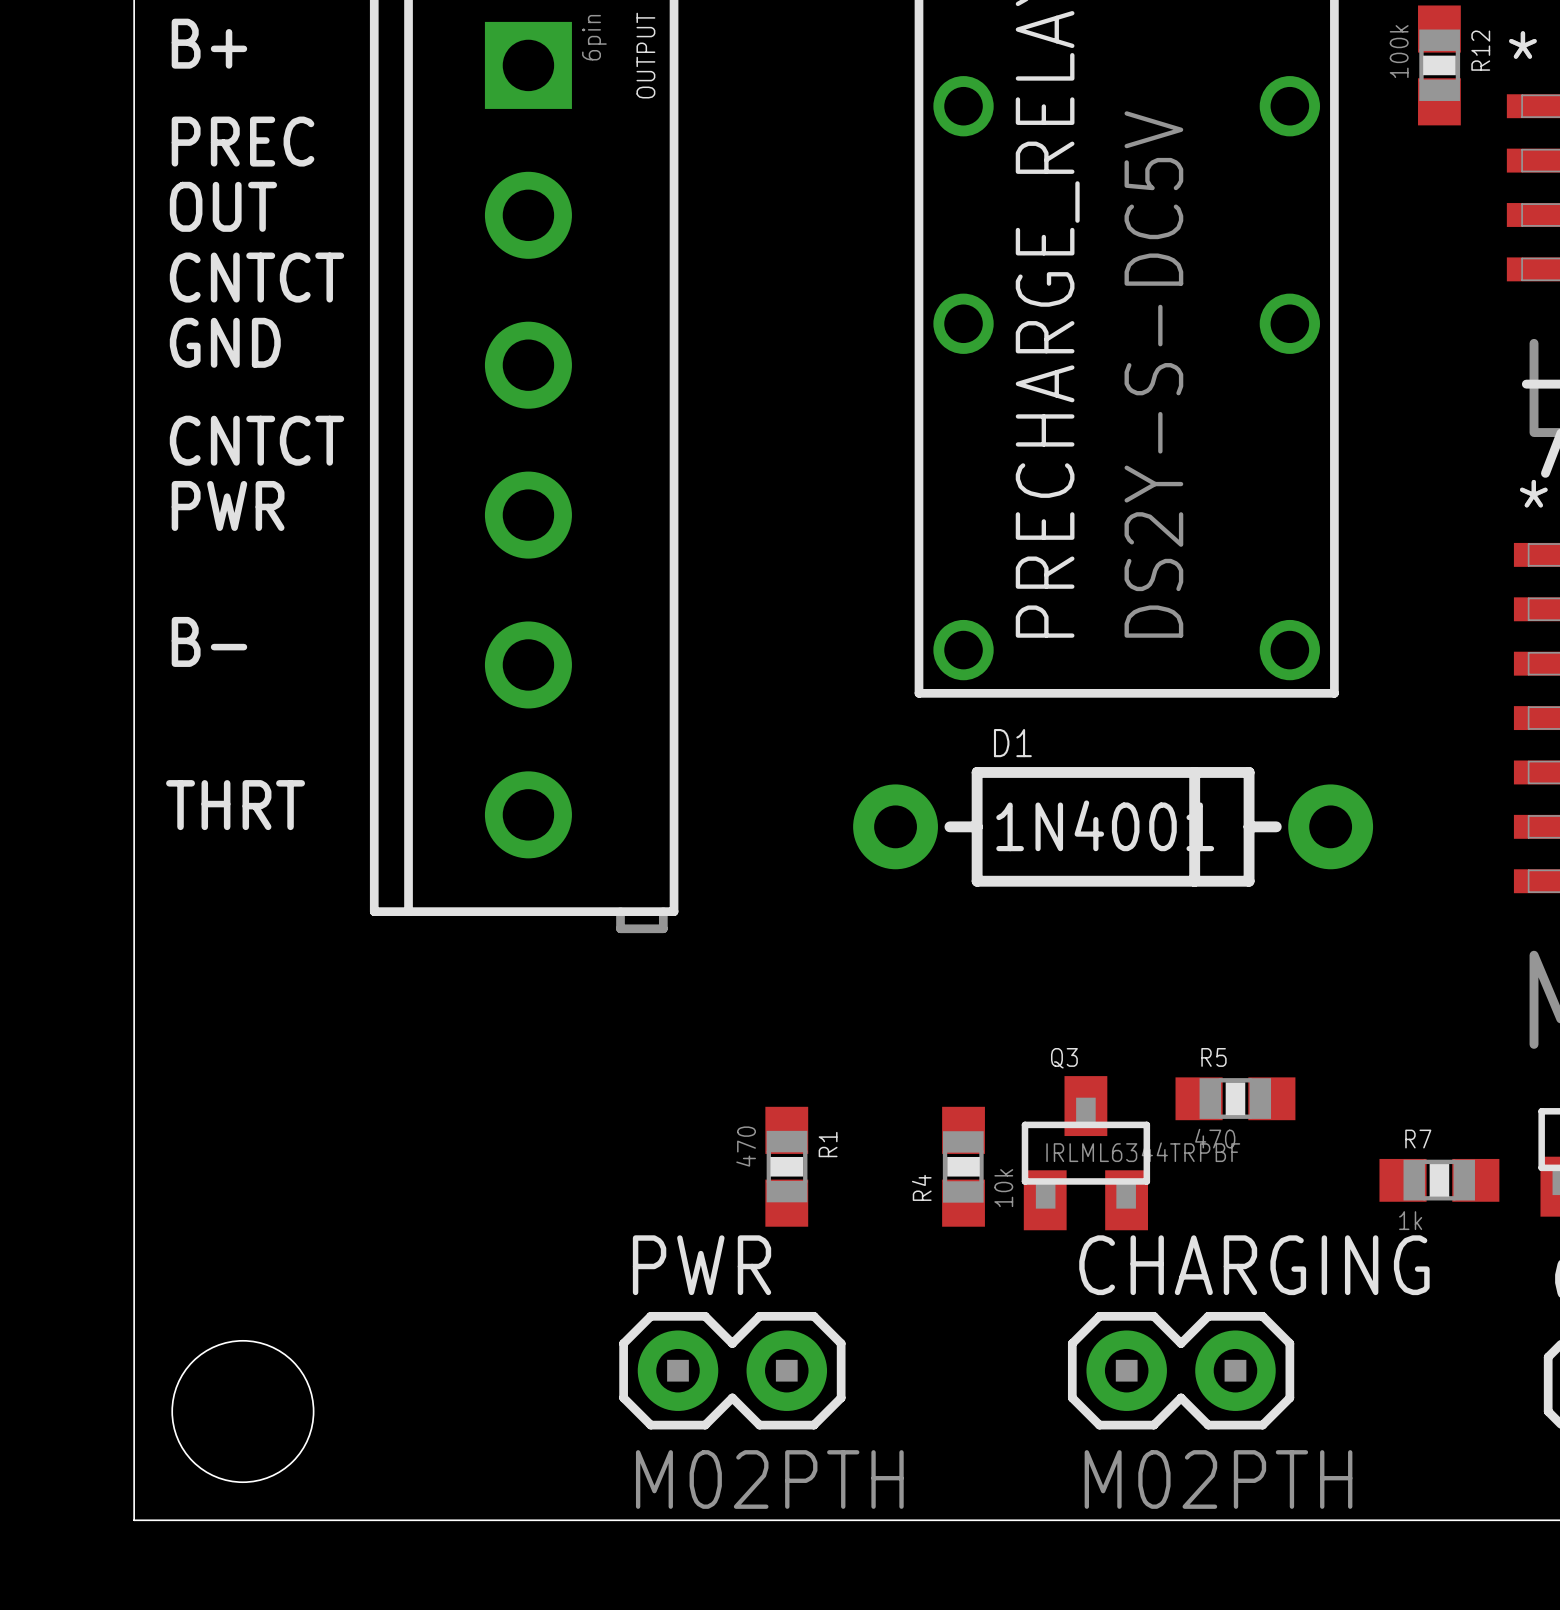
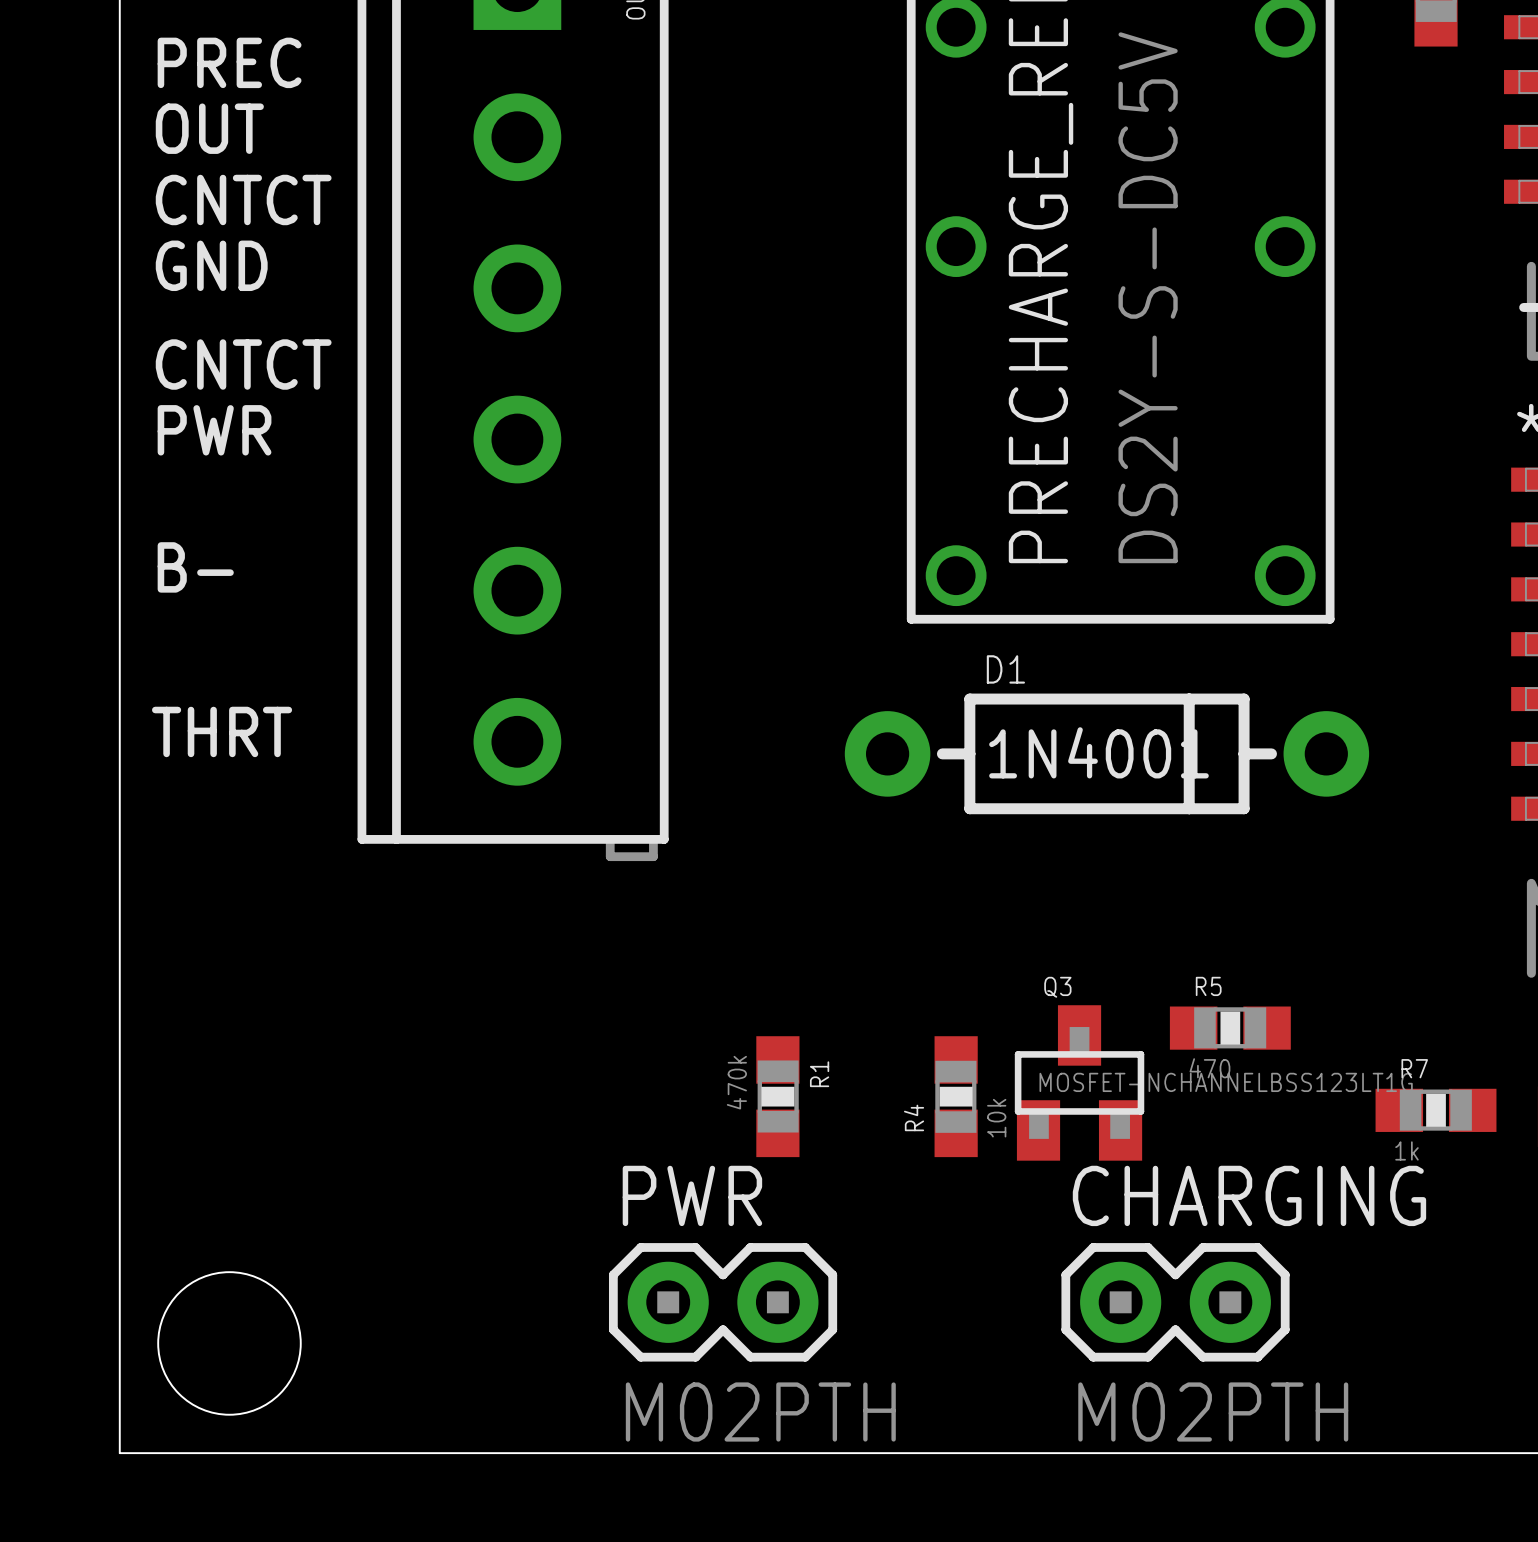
R1 value: 470 (746, 1146) -> 470k (736, 1082)
Q3 value: IRLML6344TRPBF (1143, 1152) -> MOSFET-NCHANNELBSS123LT1G (1226, 1082)

